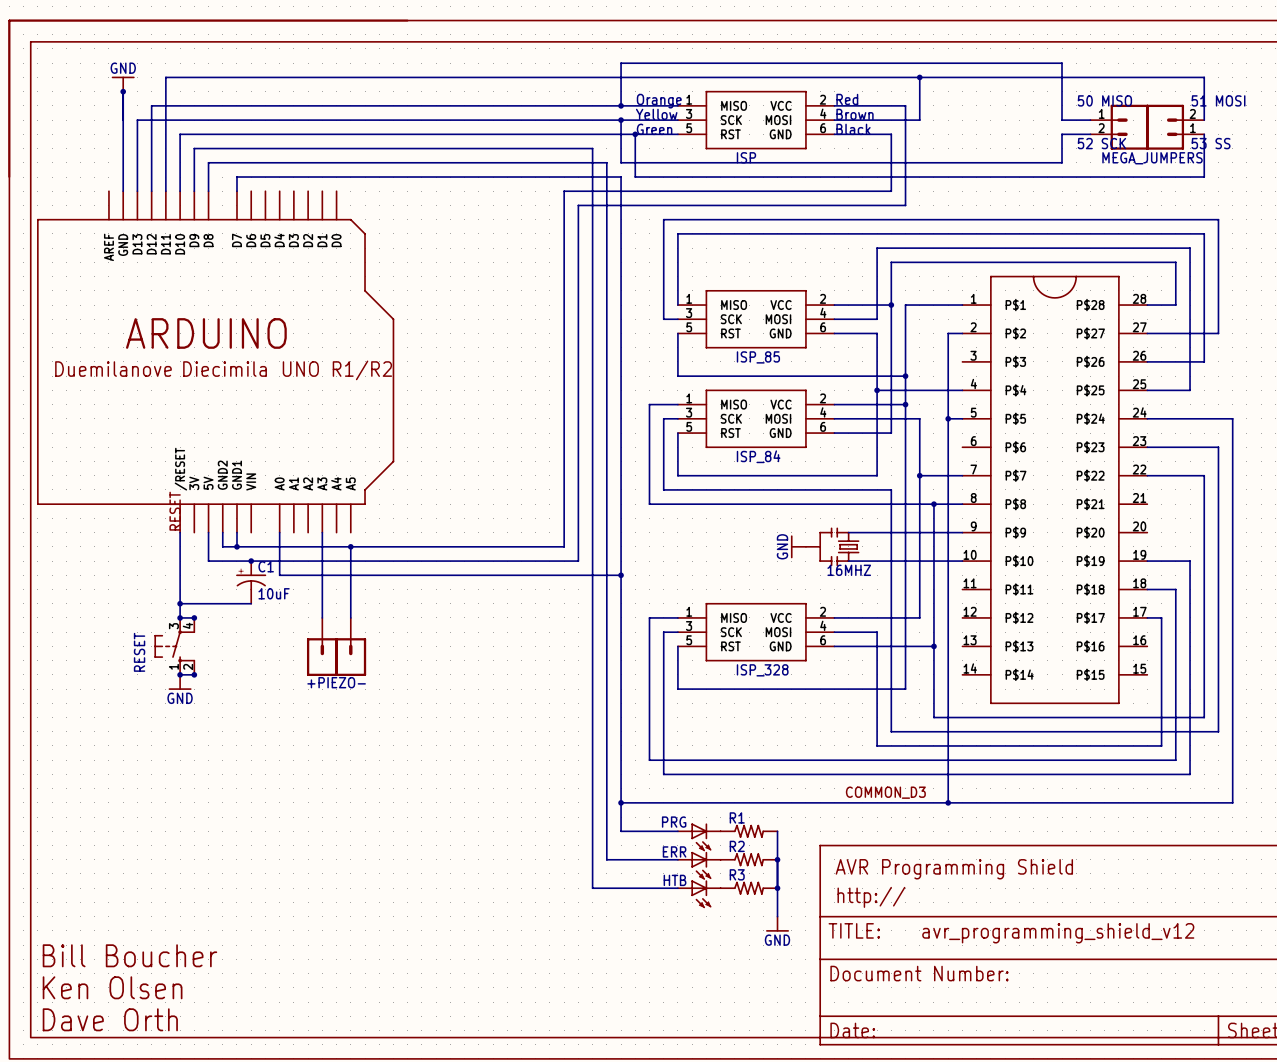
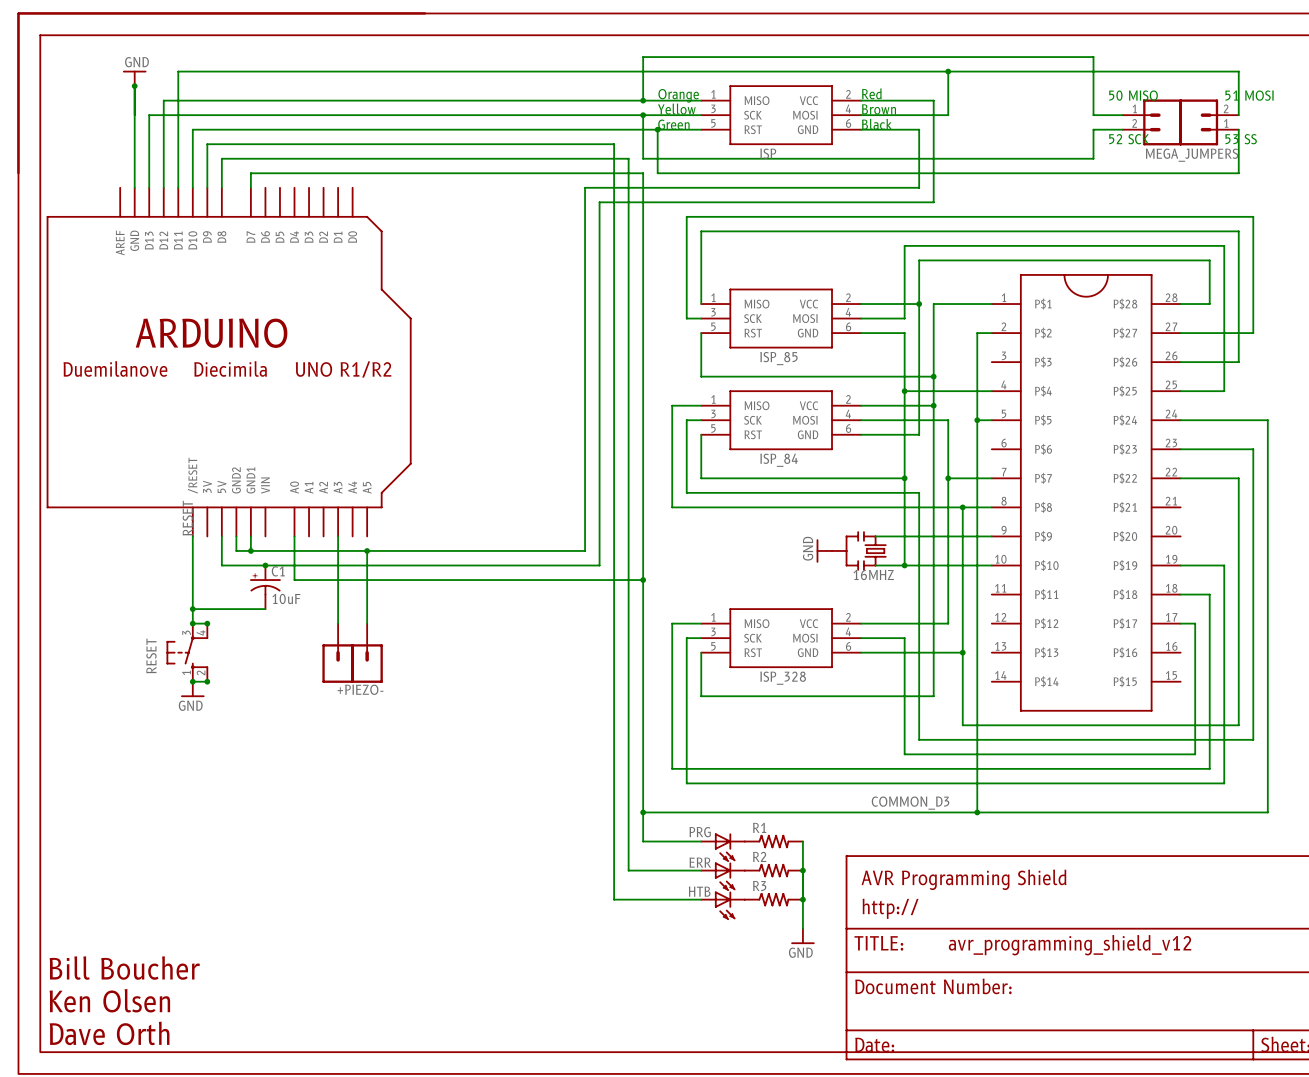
wire: none -> (904, 478) (904, 565)
junction: none -> (904, 478)
junction: none -> (904, 565)

